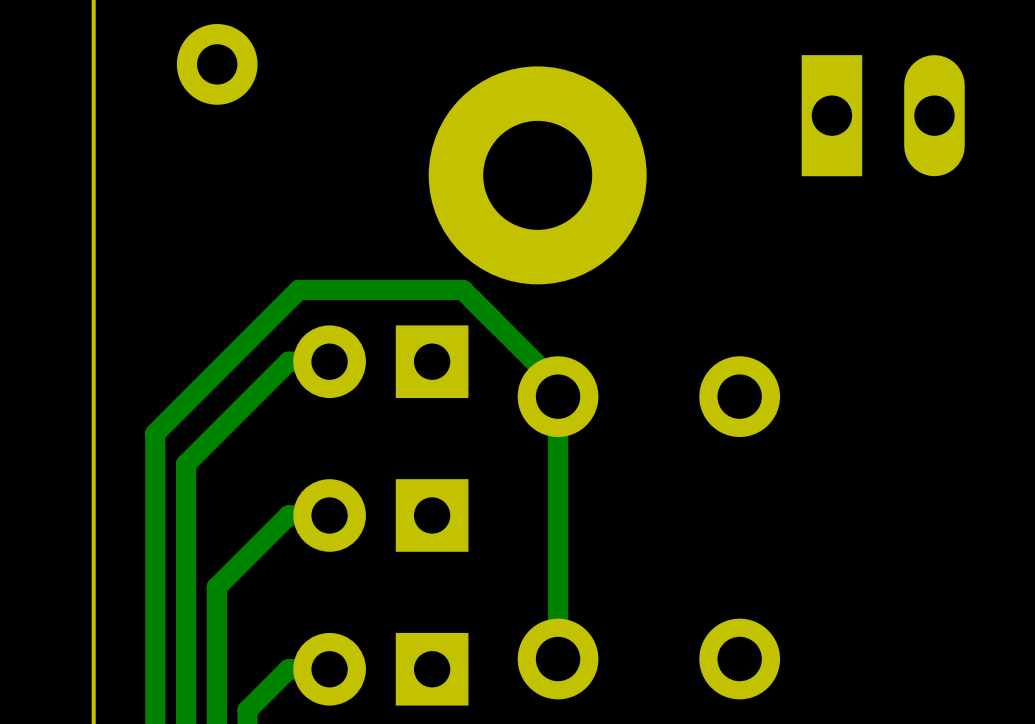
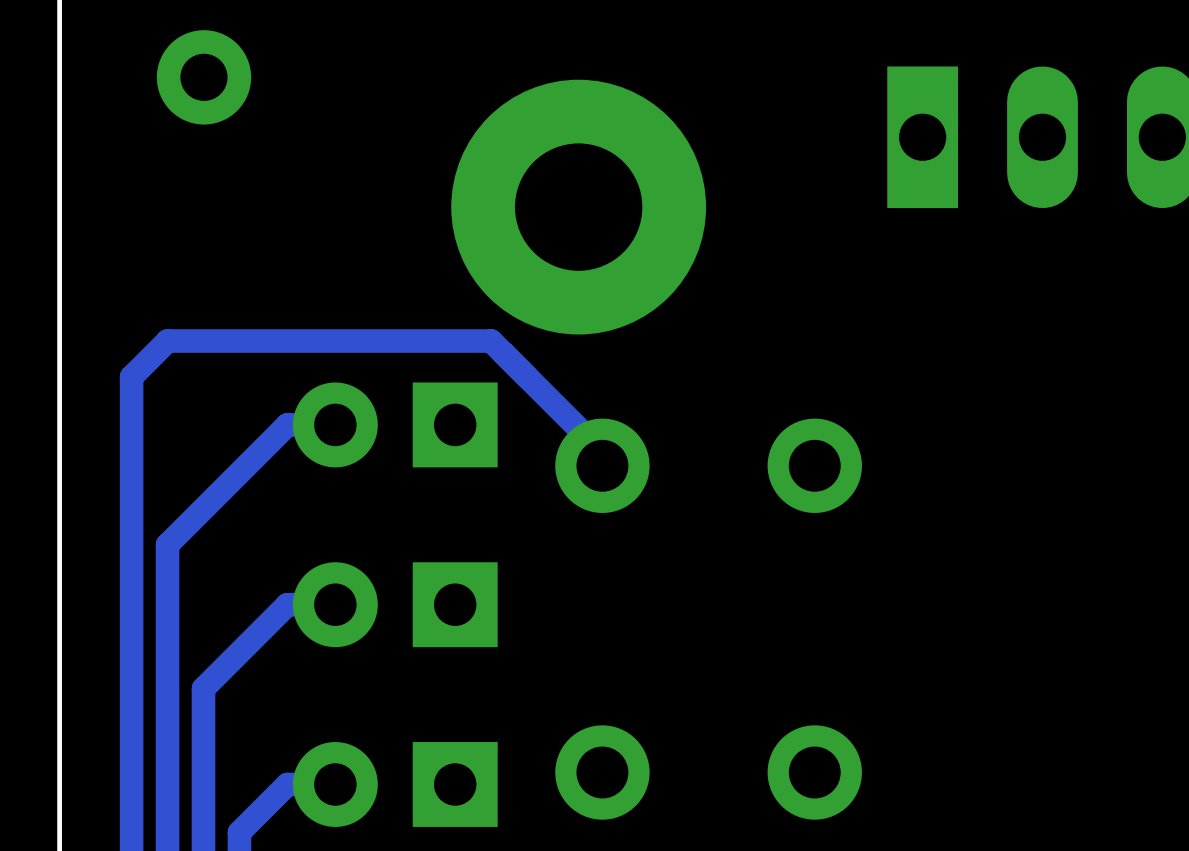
track: (298, 289) (155, 433) -> (299, 341) (167, 341) (131, 376) (131, 508)
track: (558, 396) (558, 659) -> none

